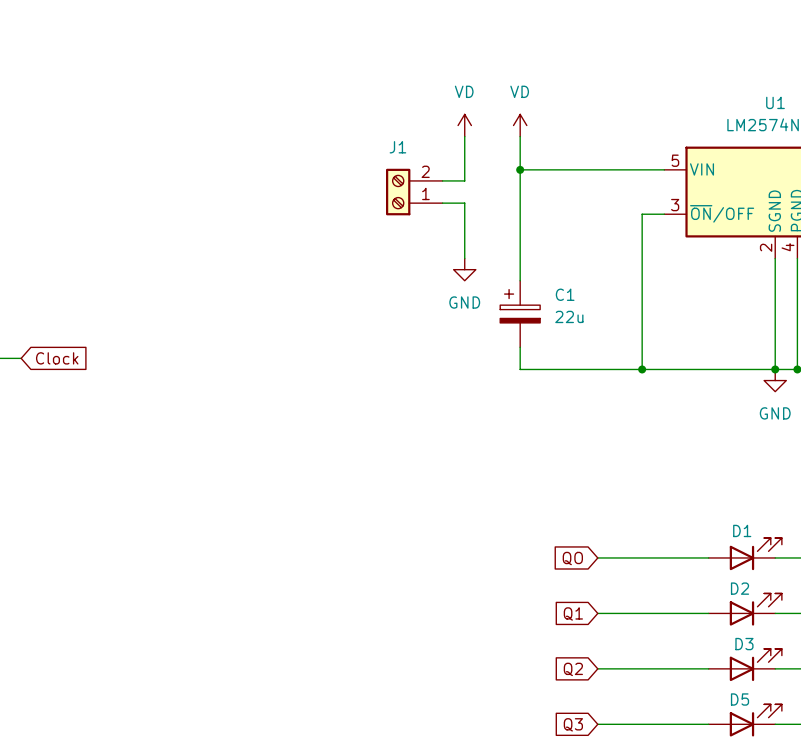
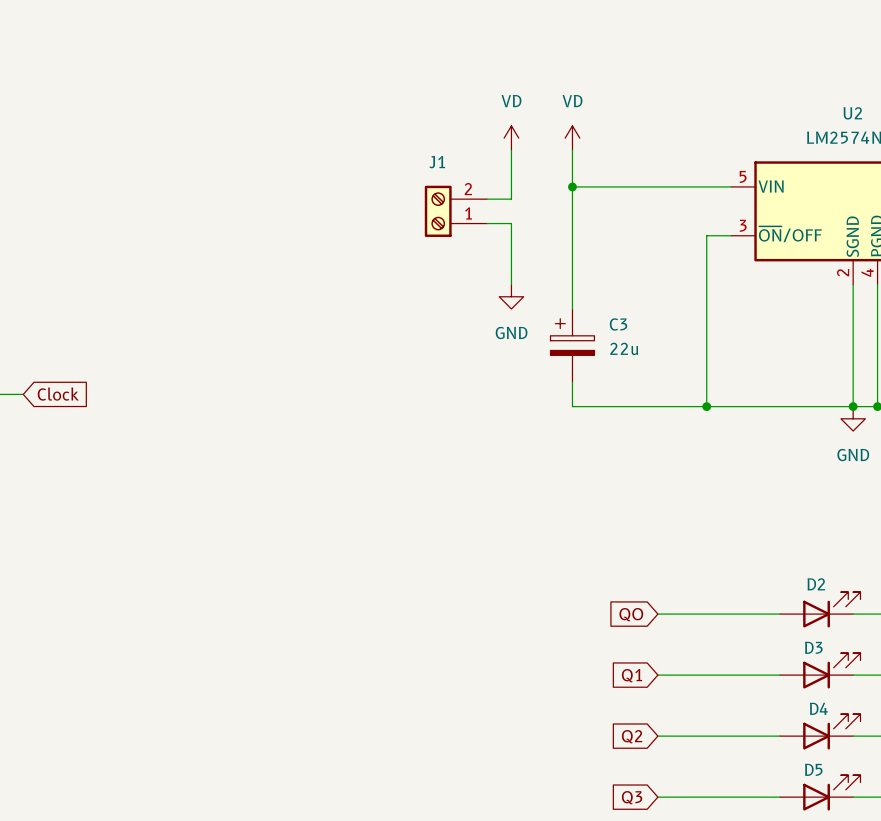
U1 name: U1 (775, 102) -> U2 (852, 113)
C1 name: C1 (565, 294) -> C3 (618, 324)
D1 name: D1 (742, 530) -> D2 (816, 584)
D2 name: D2 (740, 588) -> D3 (813, 647)
D3 name: D3 (744, 644) -> D4 (818, 708)

